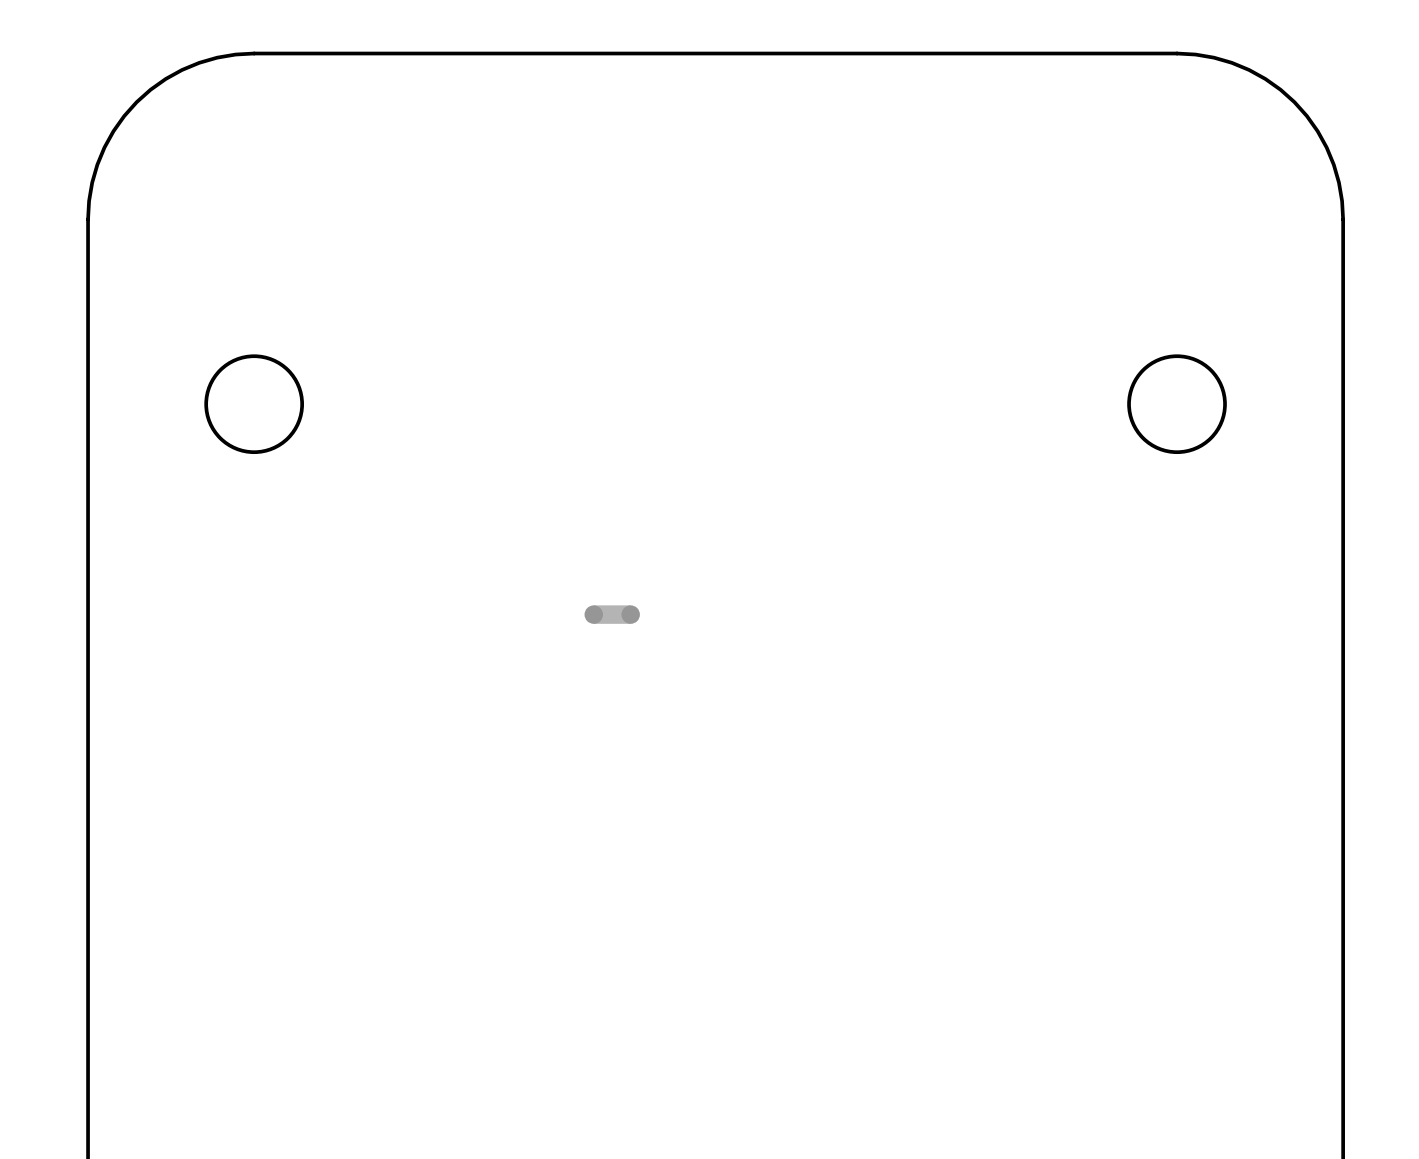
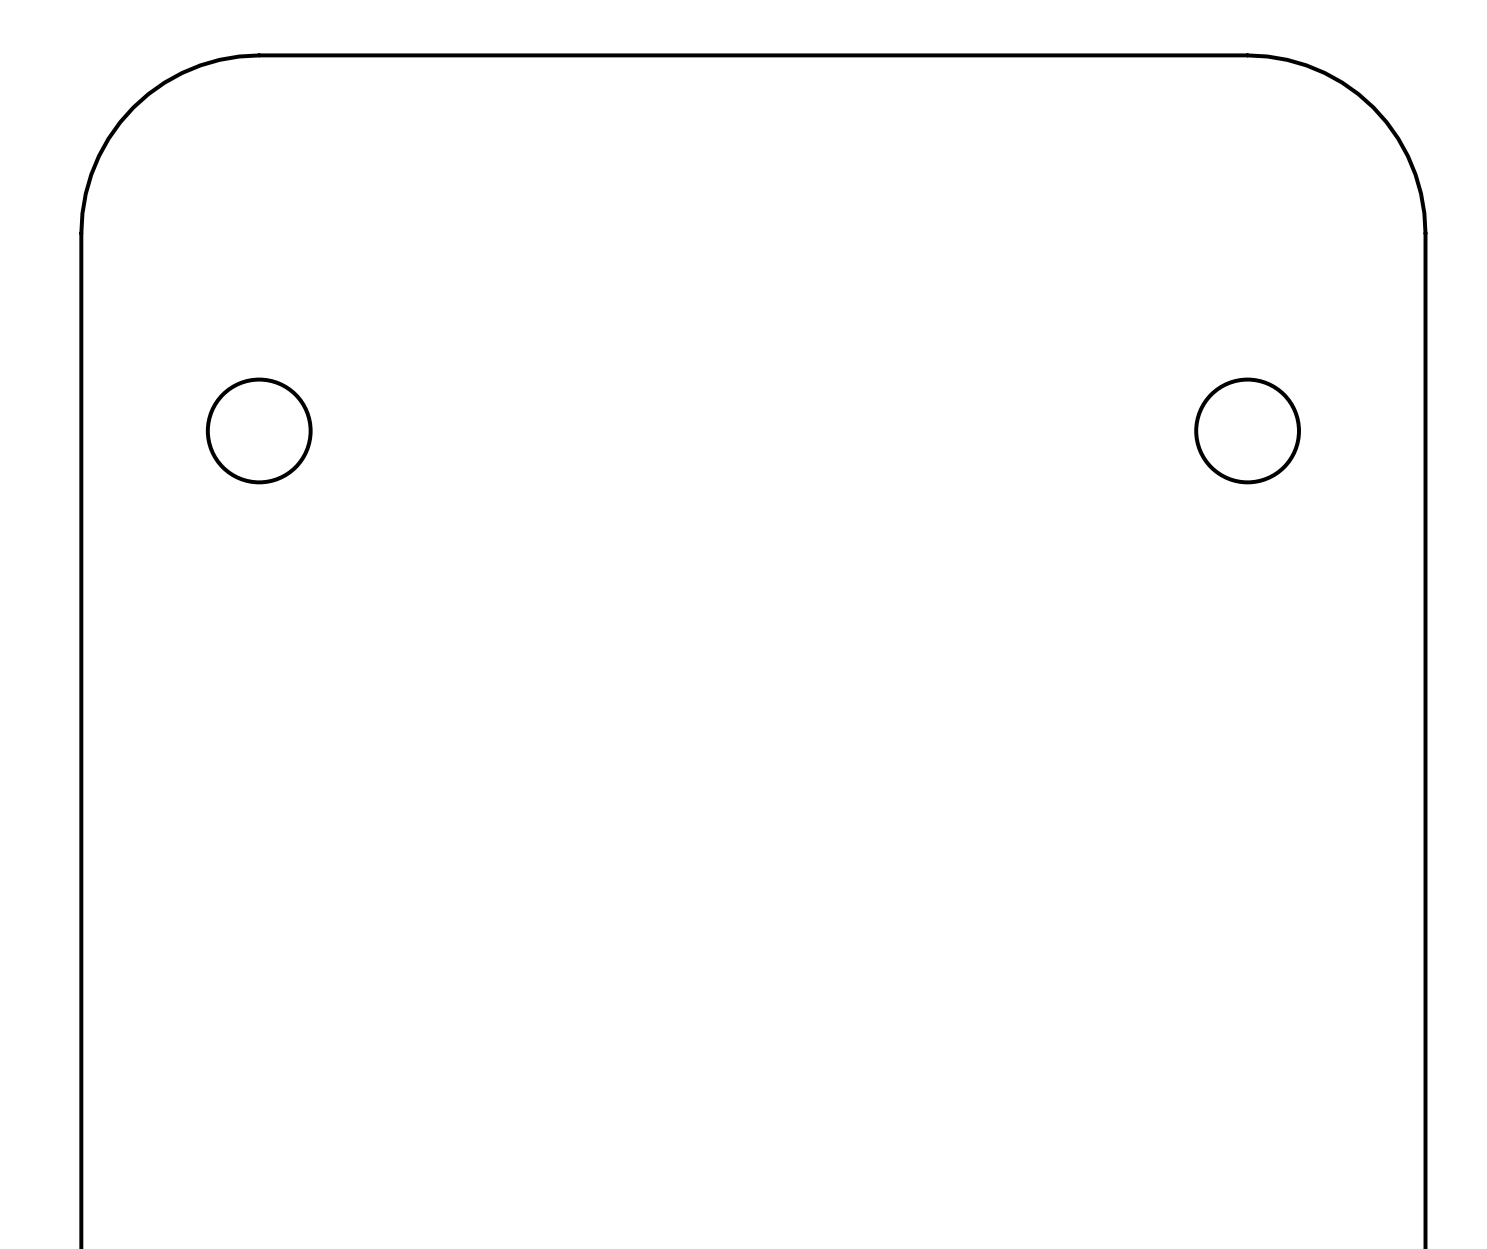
part: (612, 614) -> none

